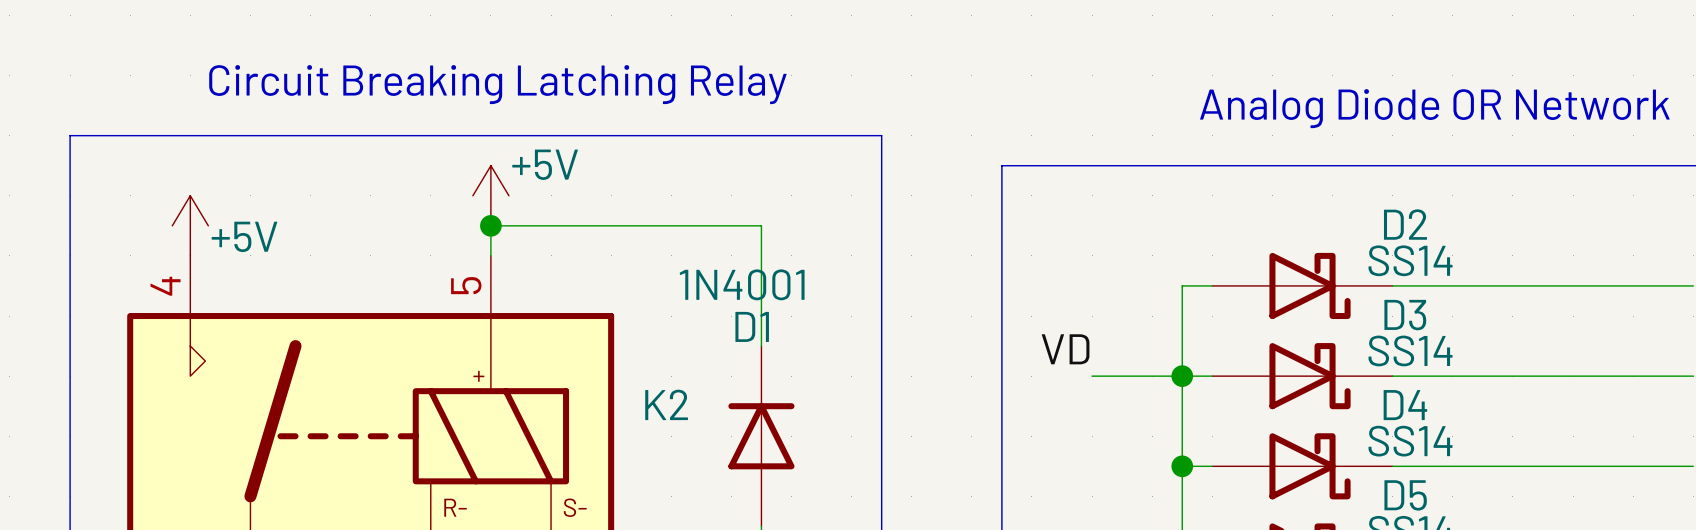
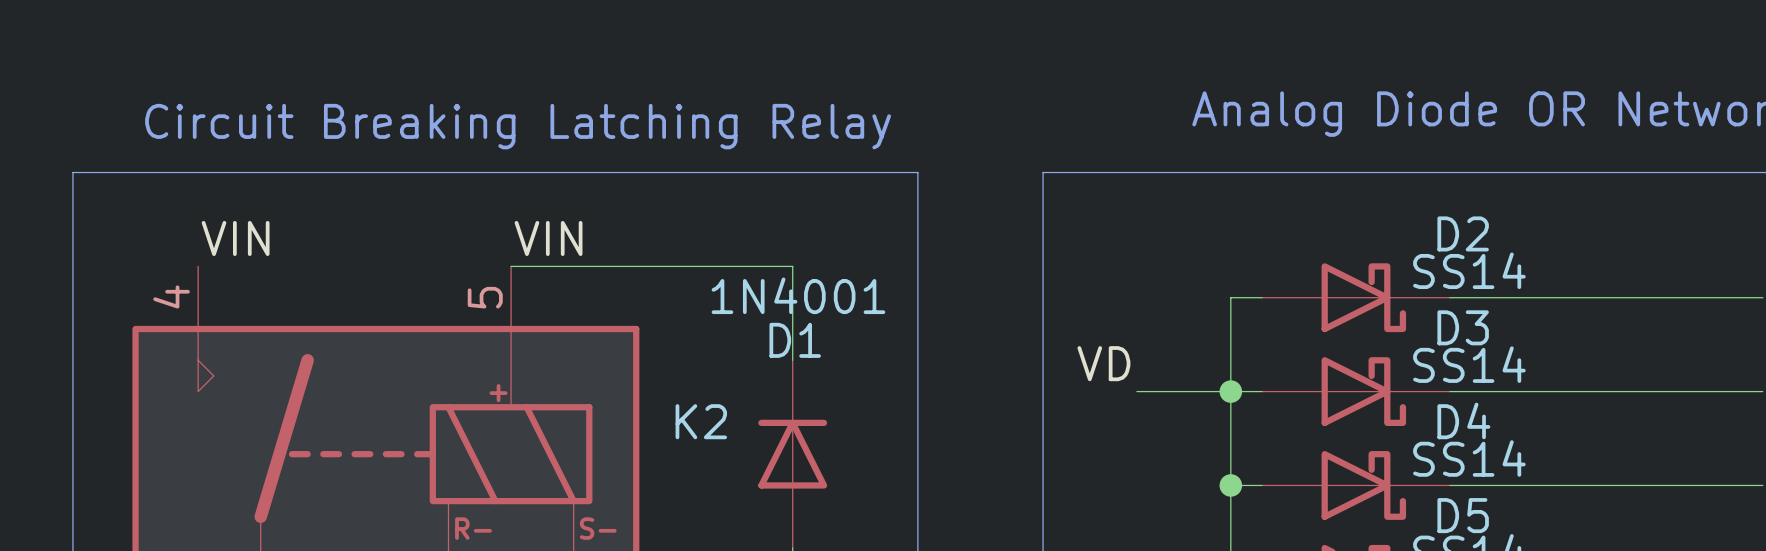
text position: Circuit Breaking Latching Relay (497, 84) -> Circuit Breaking Latching Relay (518, 126)
line: (70, 165) (70, 135) (881, 135) (881, 165) -> (72, 172) (917, 172)
power symbol: +5V (490, 195) -> none
power symbol: +5V (190, 225) -> none
junction: (490, 225) -> none
label: none -> VIN (235, 238)
label: none -> VIN (548, 238)
wire: (490, 255) (490, 225) (761, 225) (761, 255) -> (511, 266) (792, 266)

